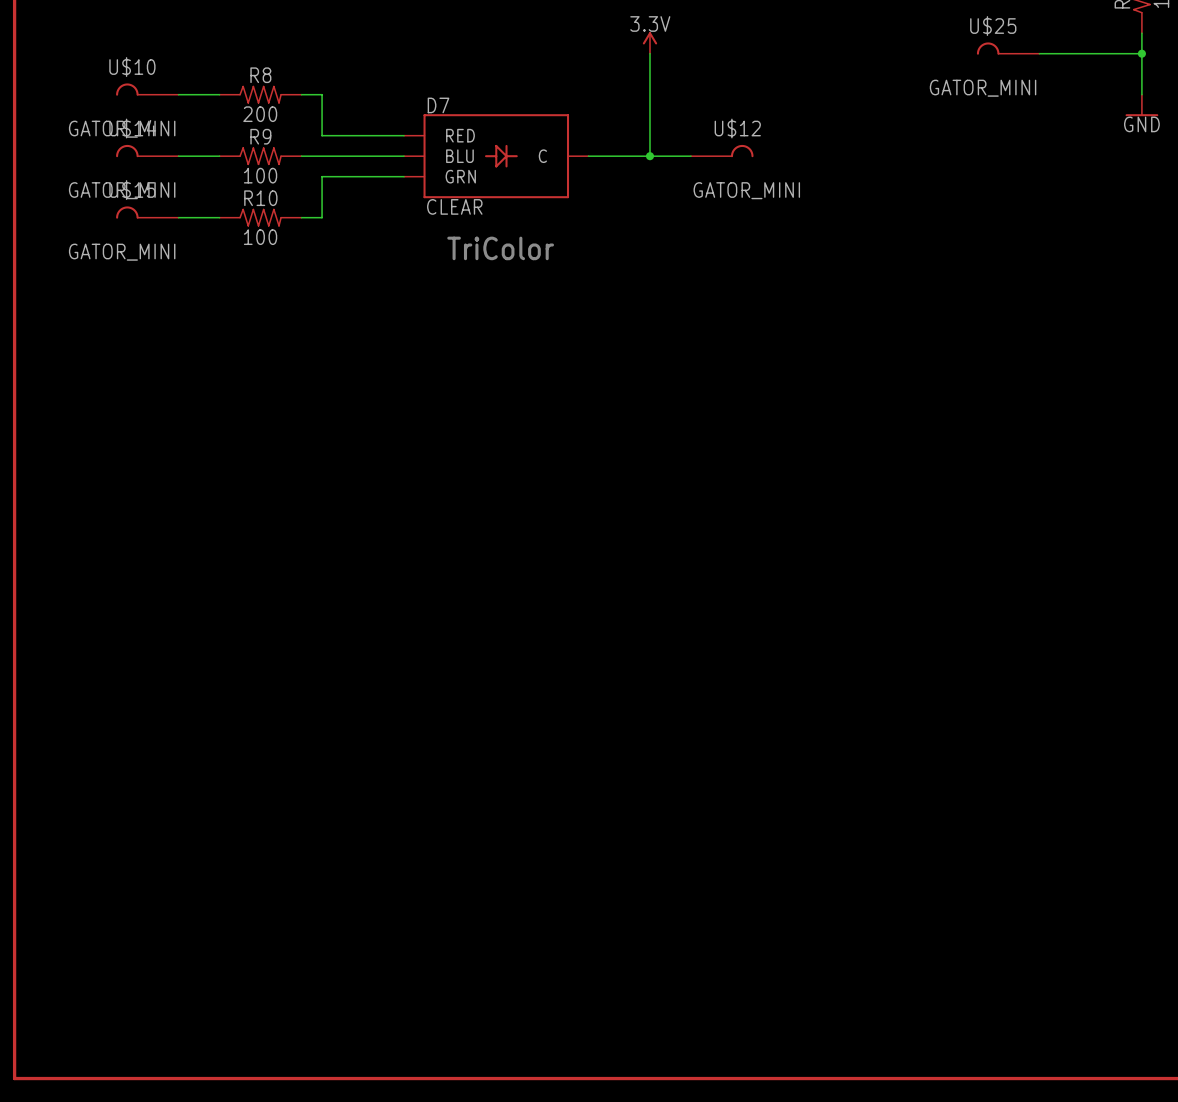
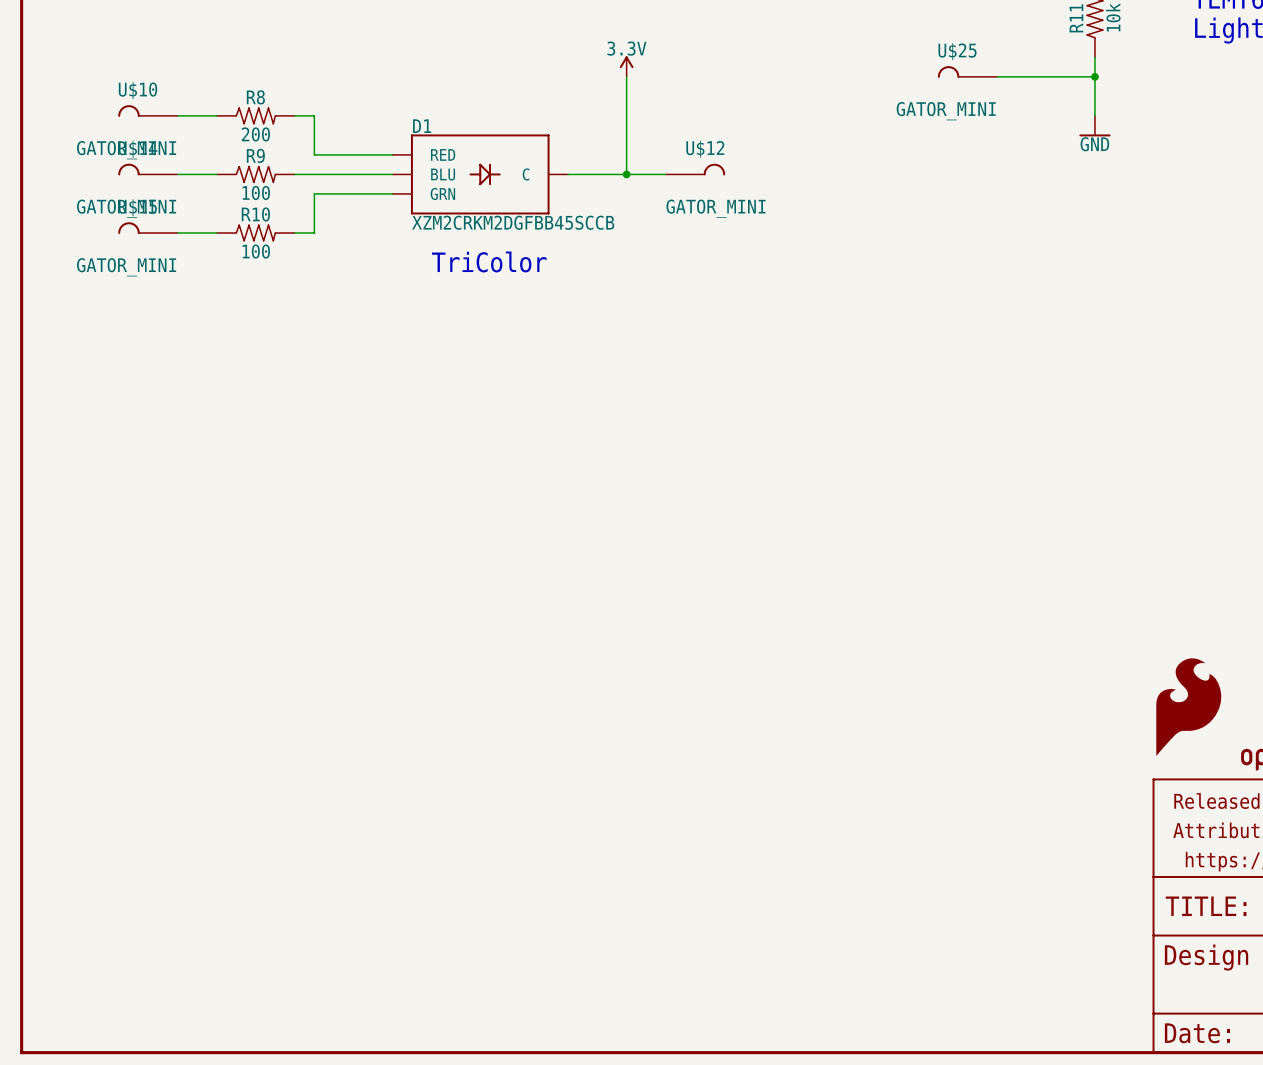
D7 name: D7 (438, 105) -> D1 (422, 126)
D7 value: CLEAR (454, 206) -> XZM2CRKM2DGFBB45SCCB (513, 222)

